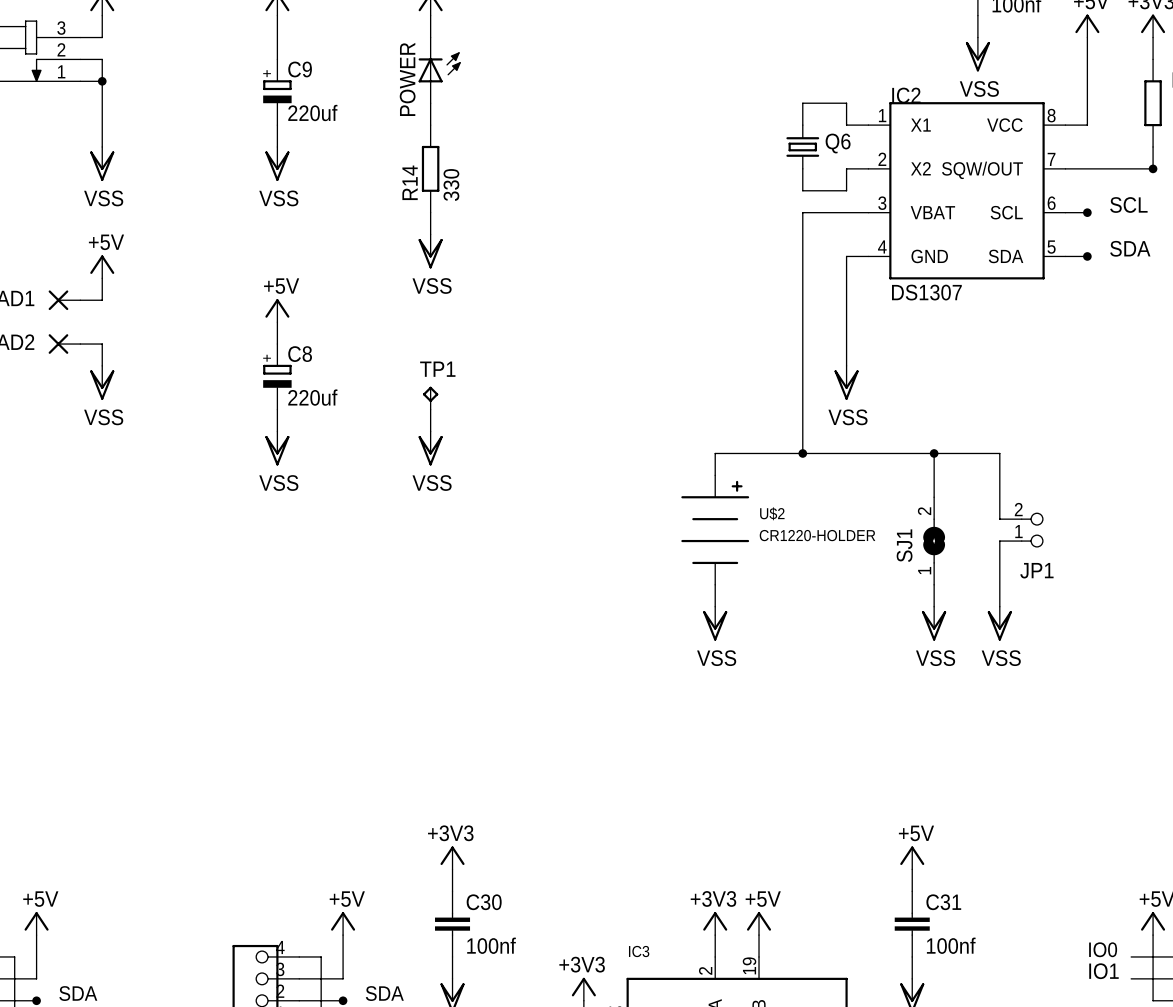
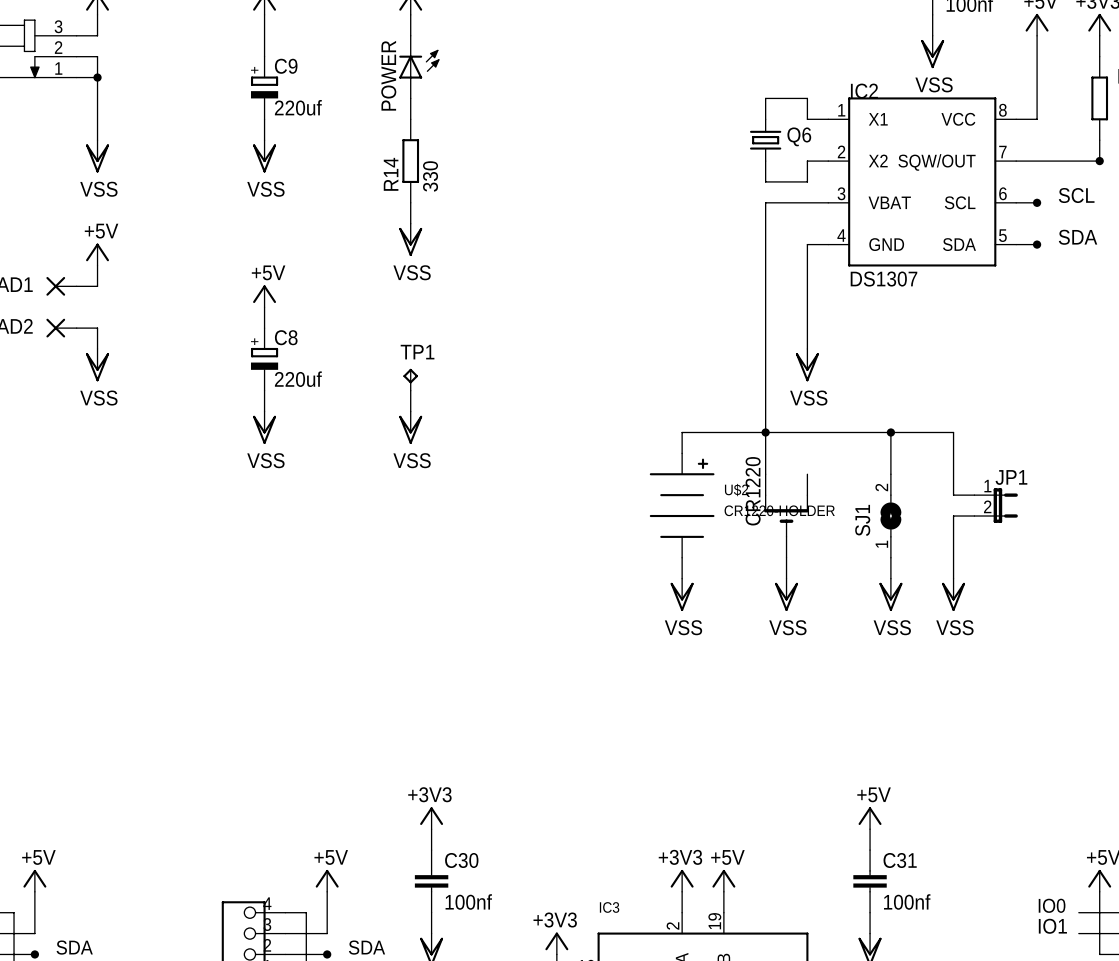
wire: none -> (765, 432) (765, 474)
JP1 symbol: [1021, 513, 1043, 547] -> [974, 488, 1018, 523]
CR1220: none -> (786, 516)
JP1 name position: JP1 (1036, 570) -> JP1 (1011, 477)
wire: none -> (786, 557) (786, 578)
power symbol: none -> VSS (786, 594)

